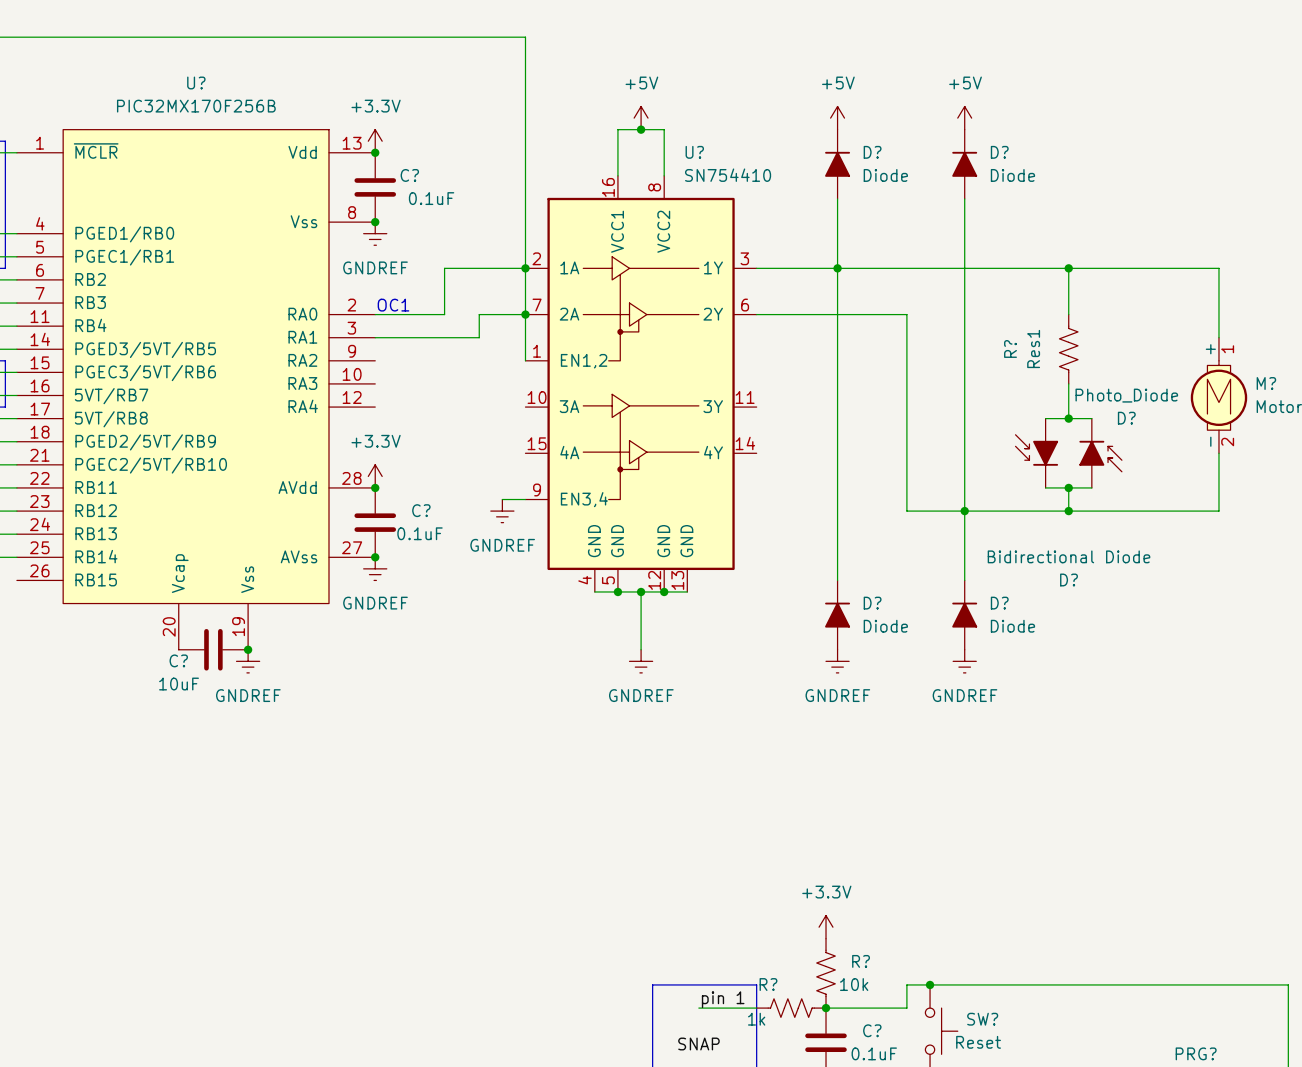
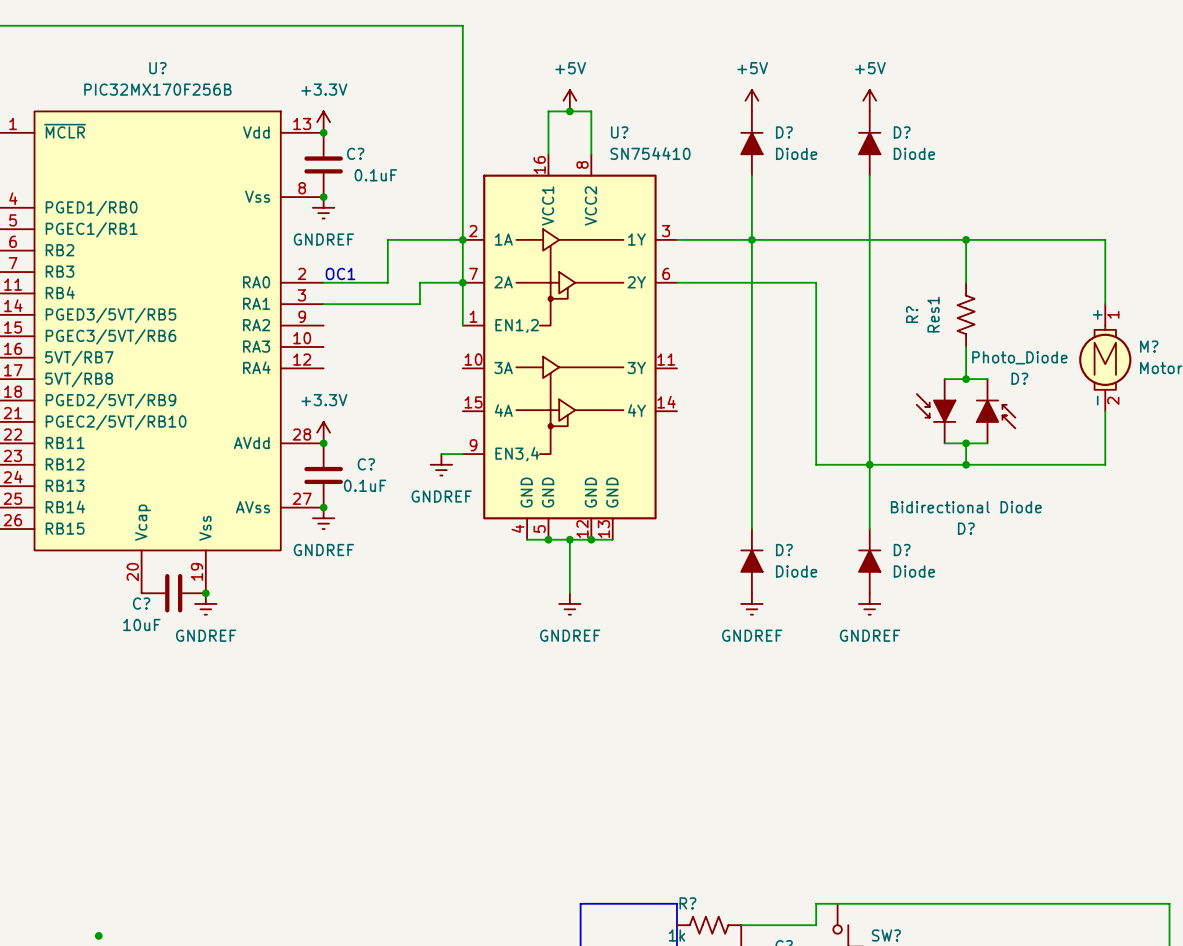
power symbol: +3.3V (826, 927) -> none
R?: 10k (826, 973) -> none
junction: (930, 984) -> none
label: pin 1 (723, 999) -> none
wire: (698, 1008) (756, 1008) -> none
junction: (826, 1008) -> none
junction: none -> (98, 935)

